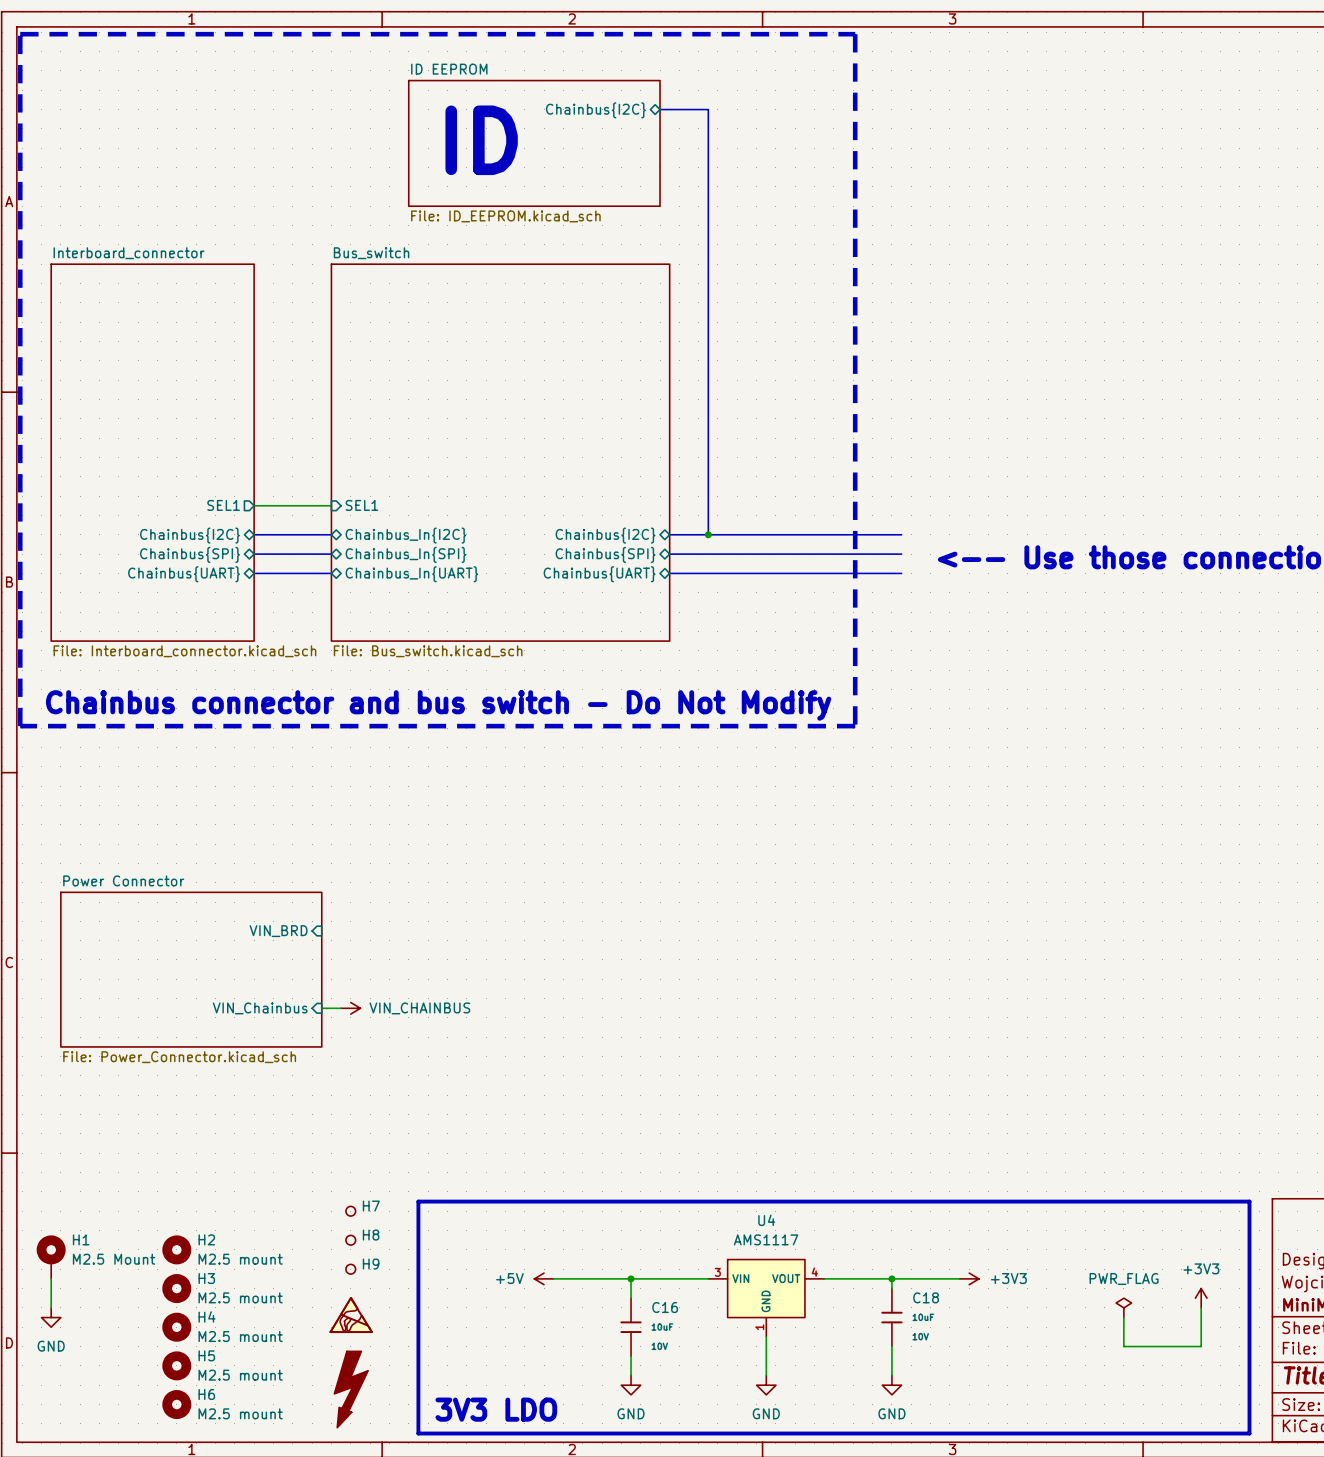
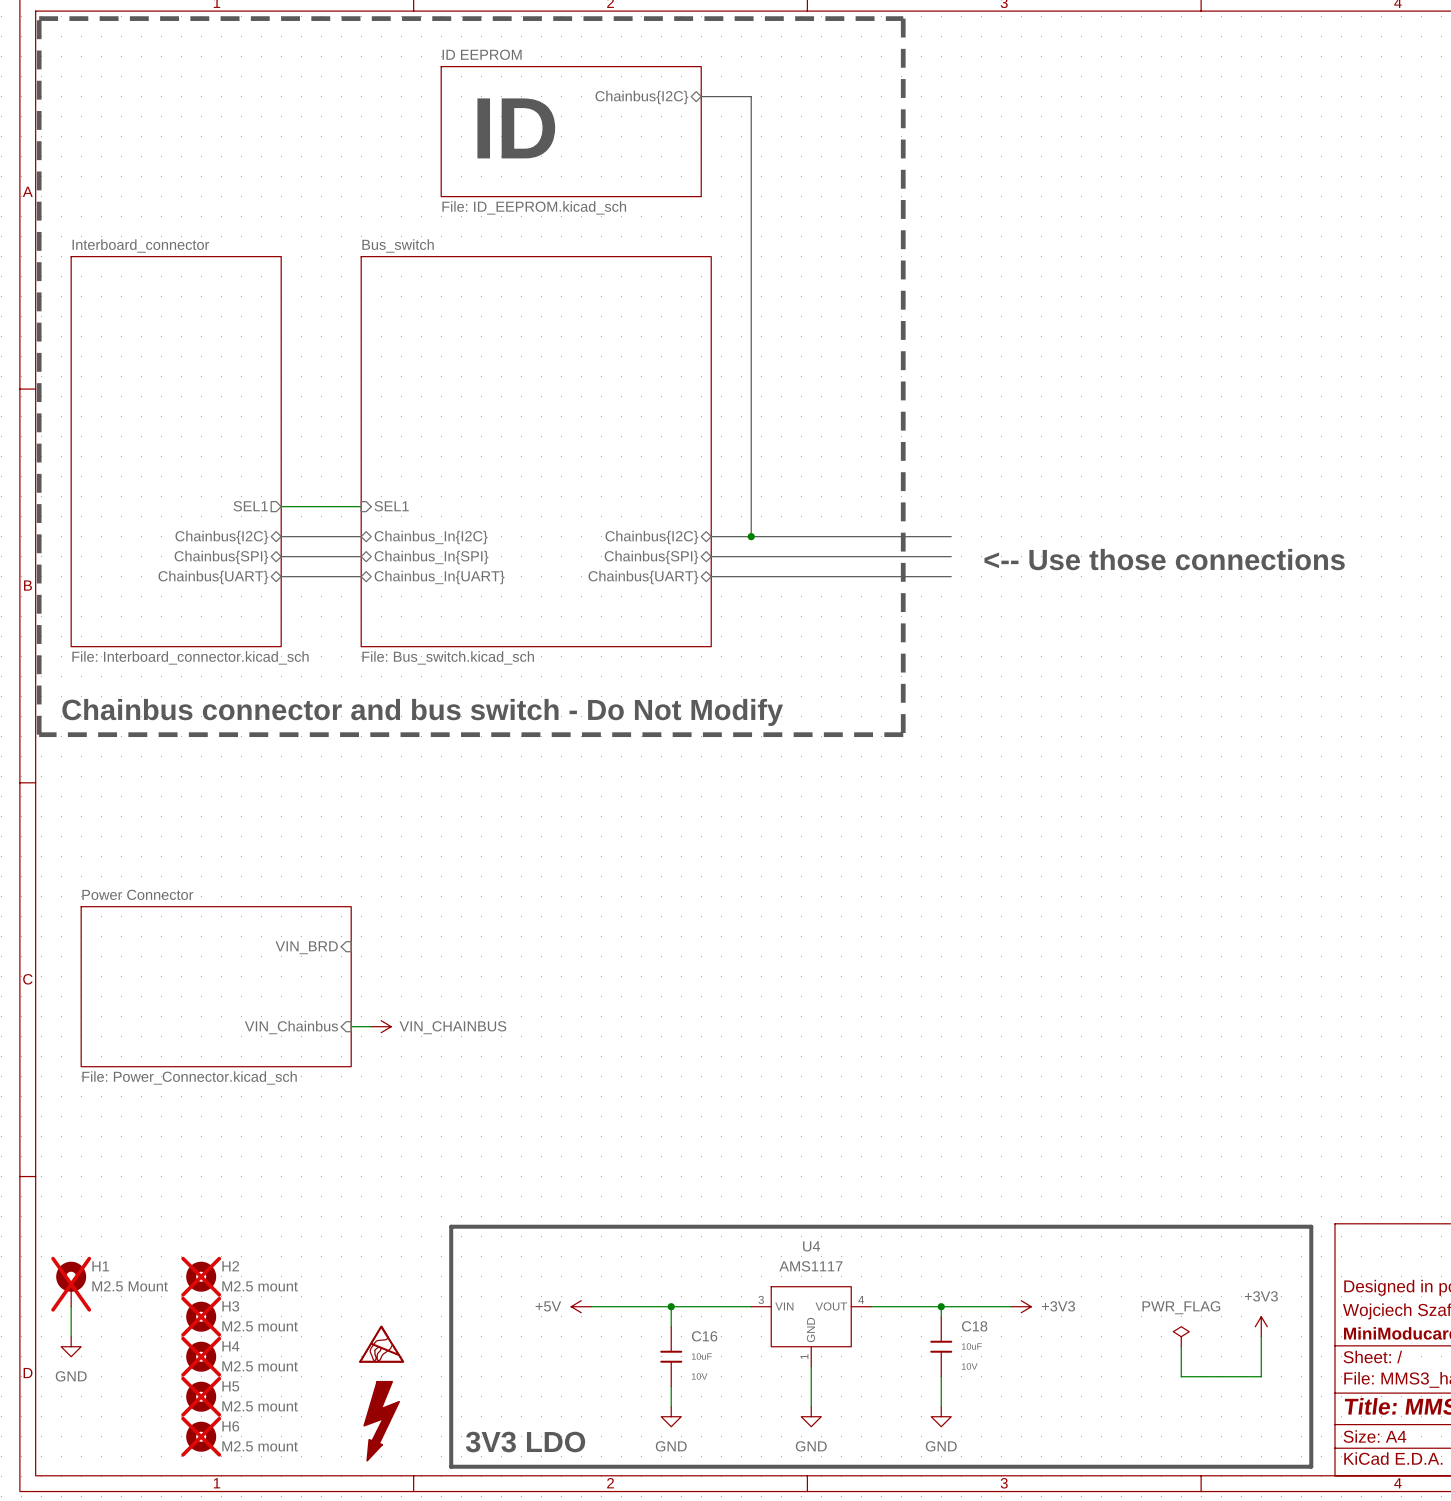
H7: (350, 1211) -> none
H8: (350, 1240) -> none
H2 do-not-place cross: none -> (201, 1276)
H1 do-not-place cross: none -> (71, 1284)
H9: (350, 1269) -> none
H3 do-not-place cross: none -> (201, 1316)
H4 do-not-place cross: none -> (201, 1356)
H5 do-not-place cross: none -> (201, 1396)
H6 do-not-place cross: none -> (201, 1436)

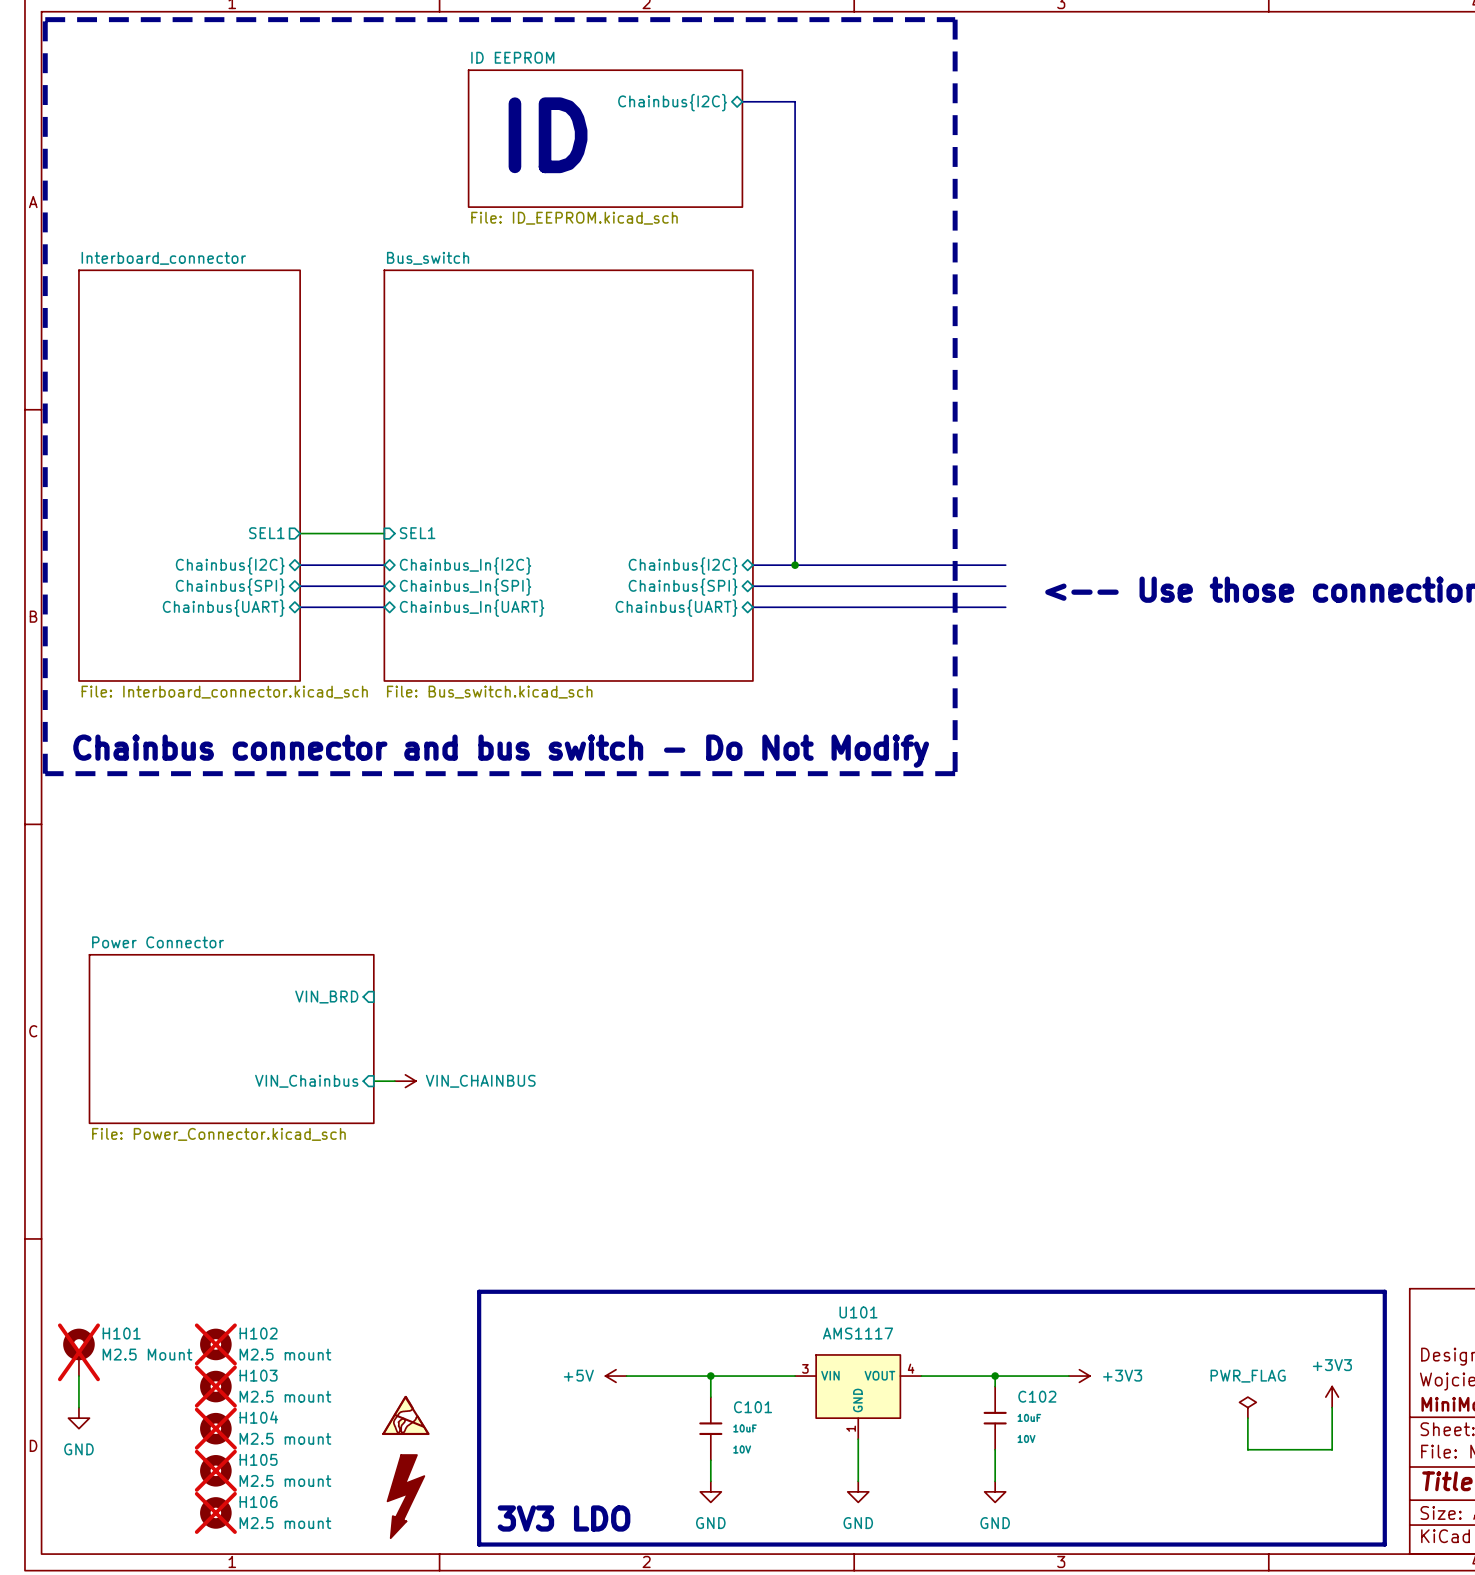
U4 name: U4 (811, 1246) -> U101 (858, 1312)
H1 name: H1 (100, 1266) -> H101 (121, 1333)
H2 name: H2 (230, 1266) -> H102 (258, 1333)
H3 name: H3 (230, 1306) -> H103 (258, 1375)
C18 name: C18 (974, 1326) -> C102 (1037, 1396)
C16 name: C16 (704, 1336) -> C101 (753, 1407)
H4 name: H4 (230, 1346) -> H104 (258, 1417)
H5 name: H5 (230, 1386) -> H105 (258, 1459)
H6 name: H6 (230, 1426) -> H106 (258, 1502)

